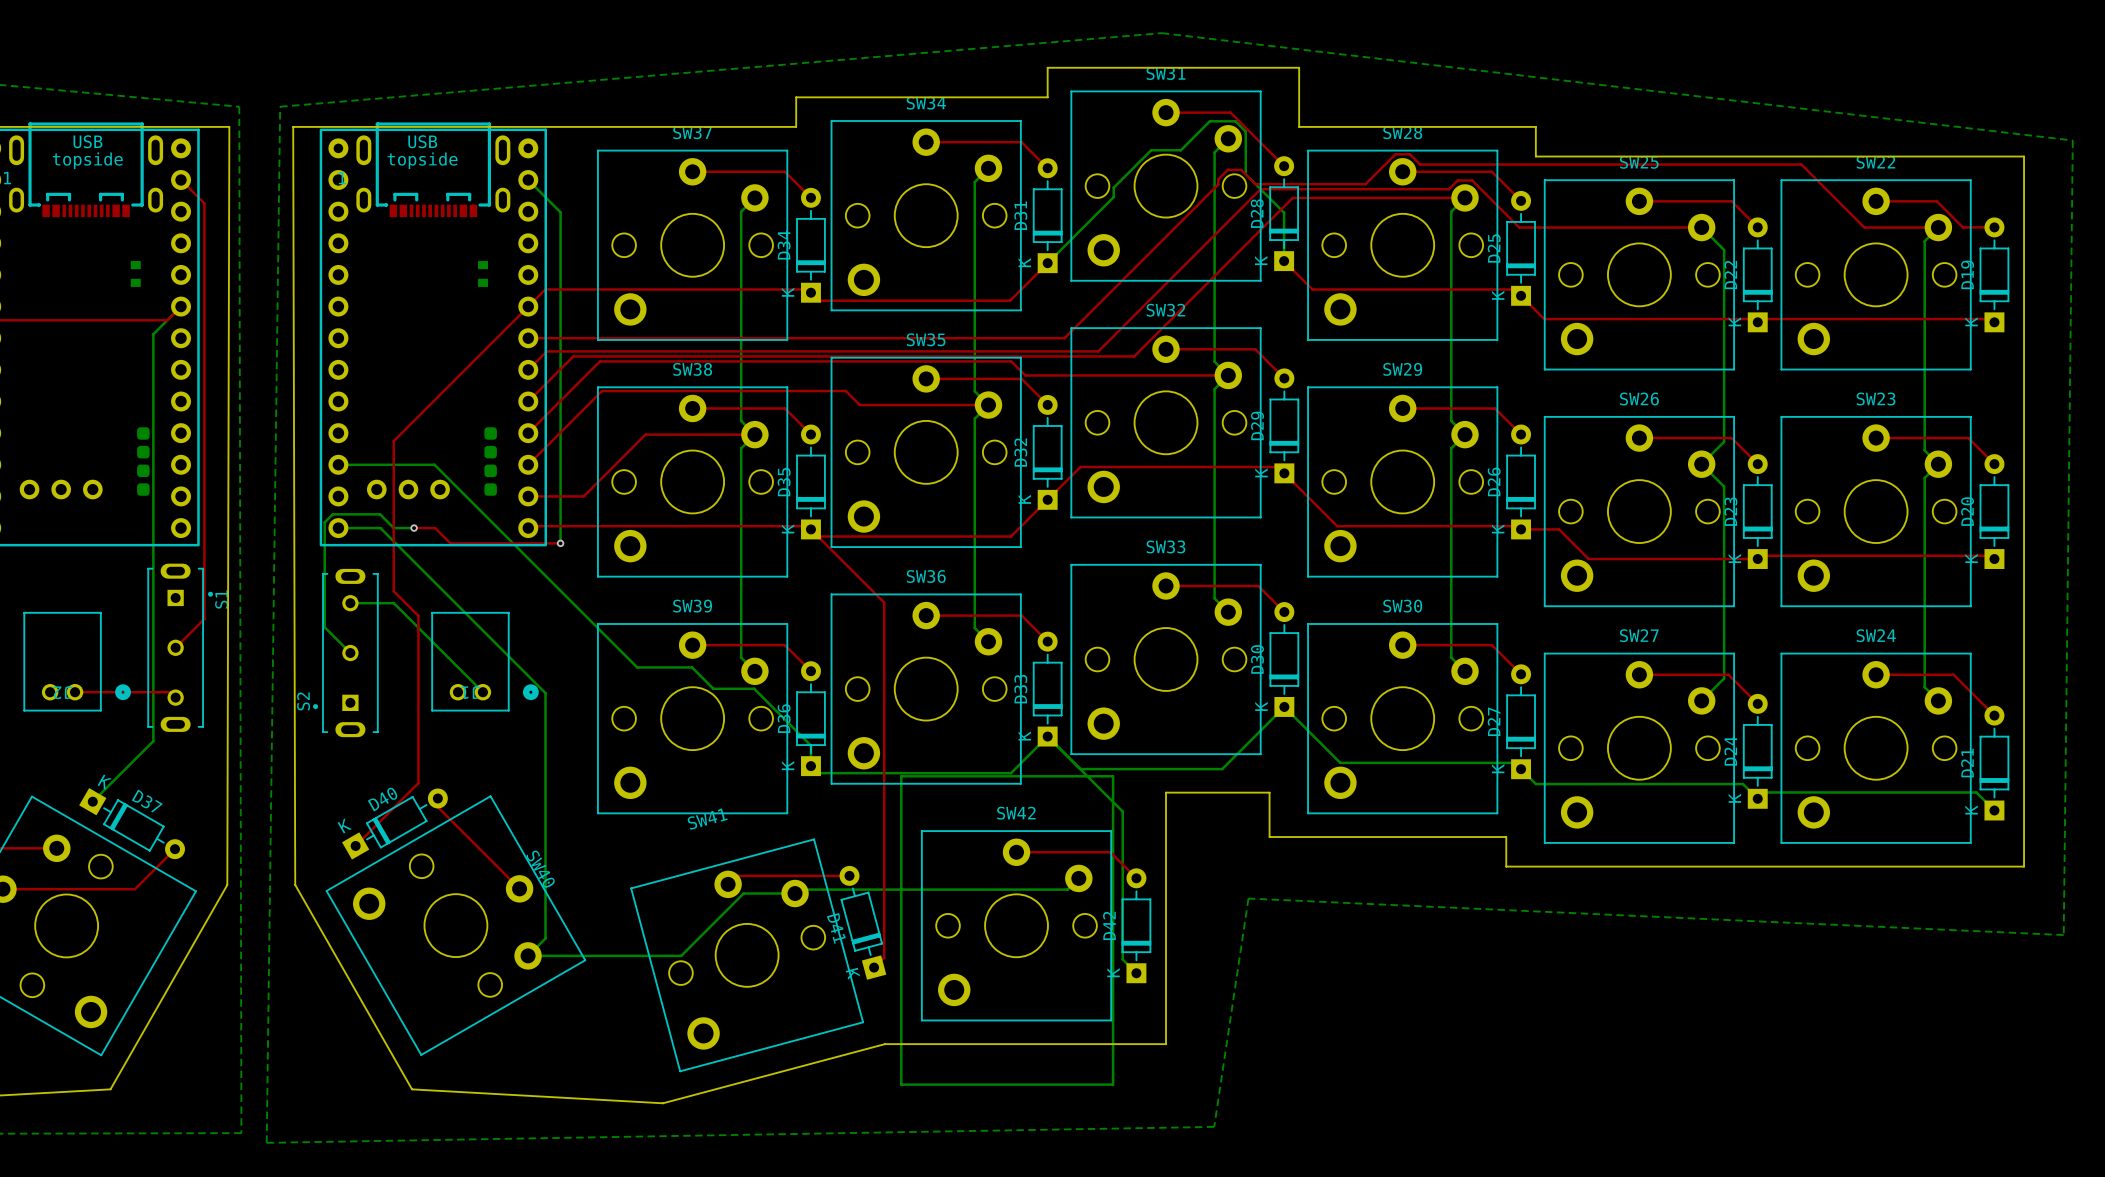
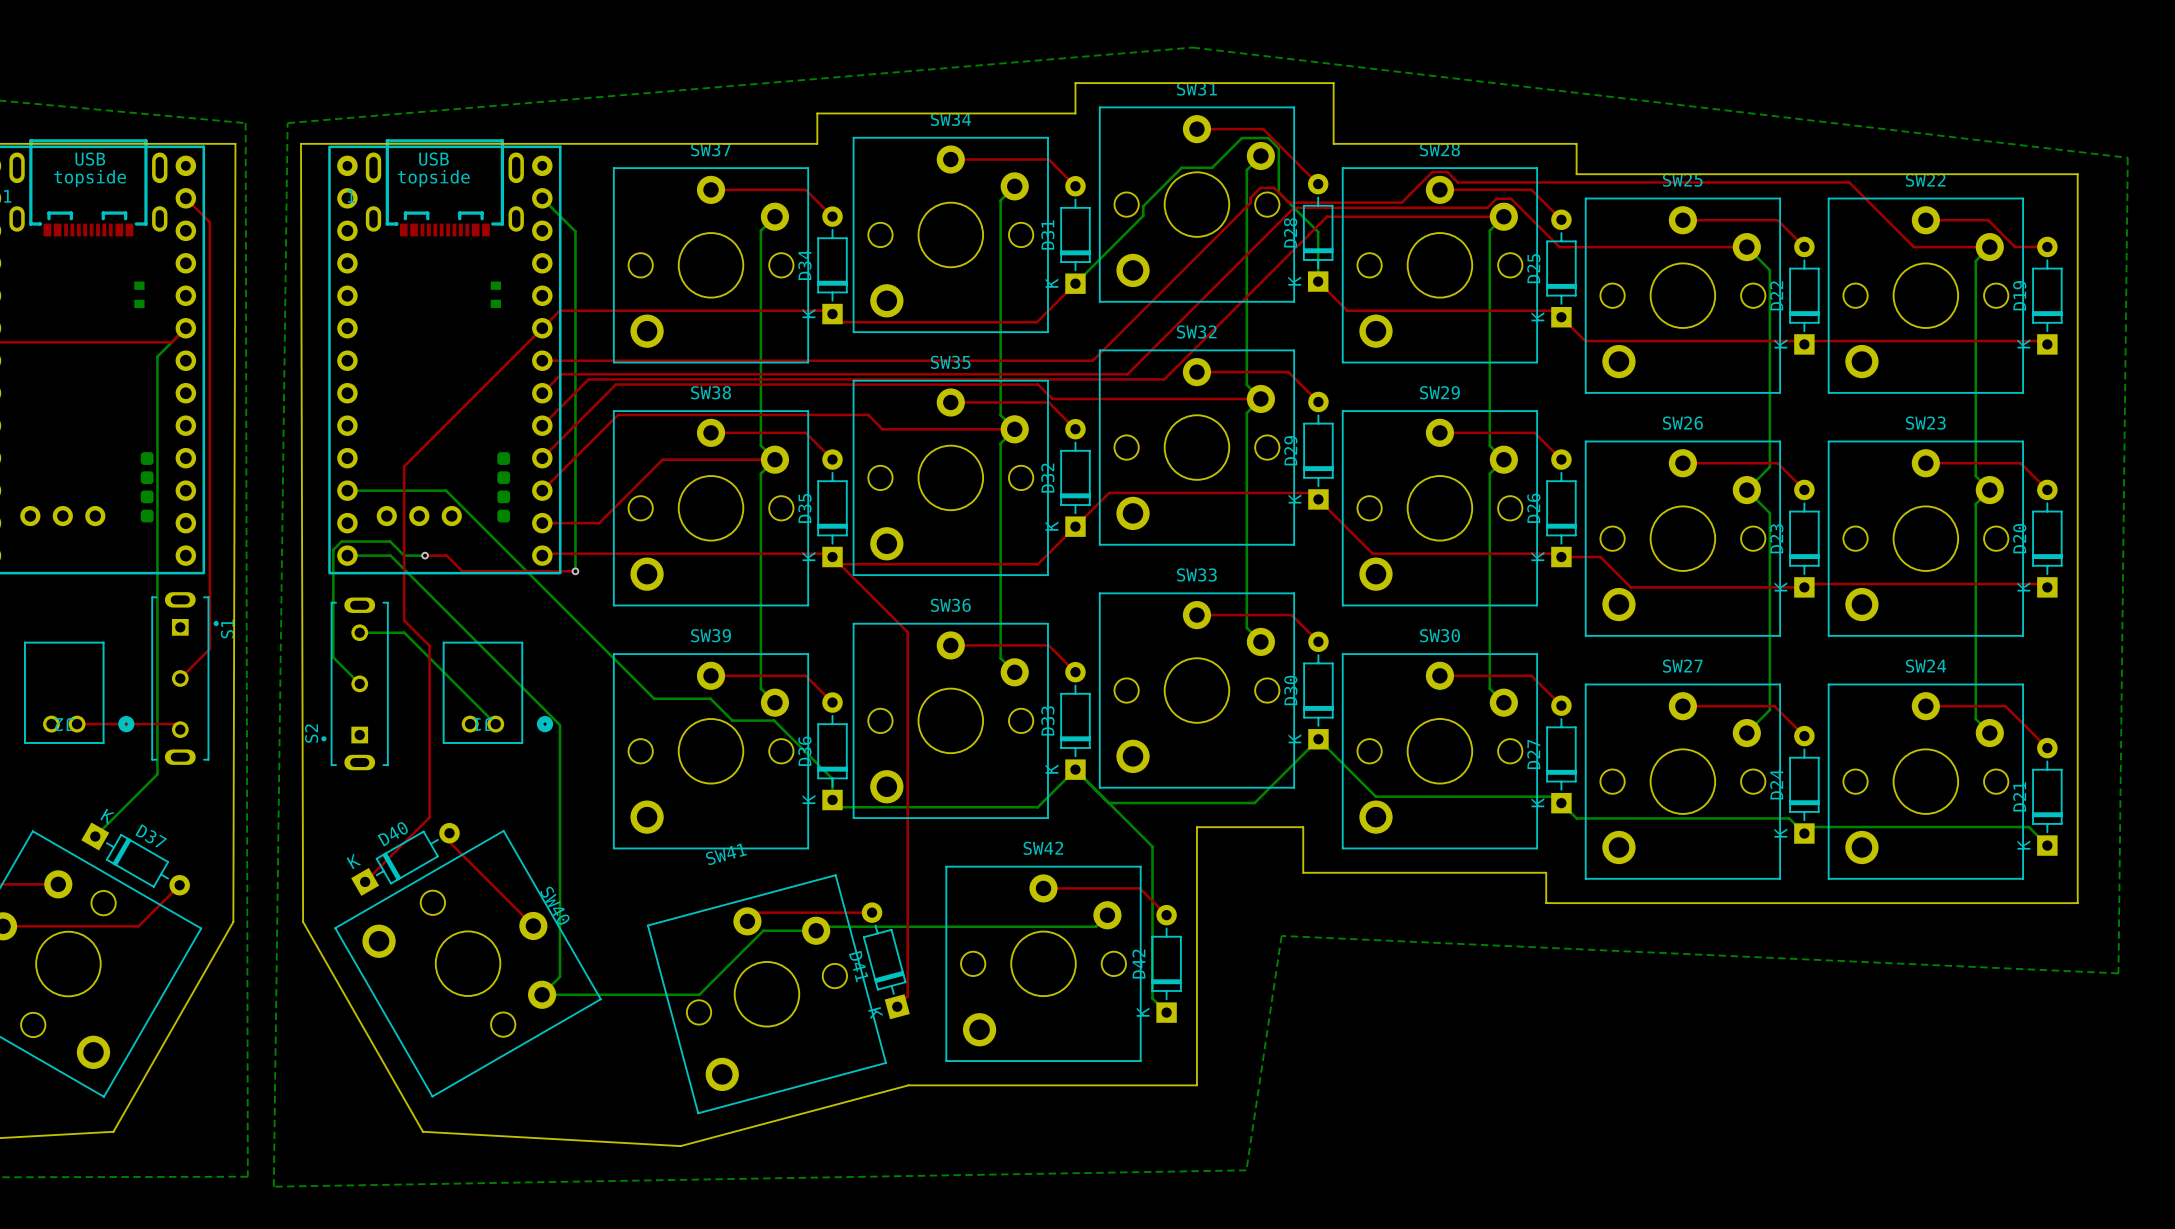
bottom track: (901, 776) (1113, 776) (1113, 1084) (901, 1084) (901, 776) -> none

